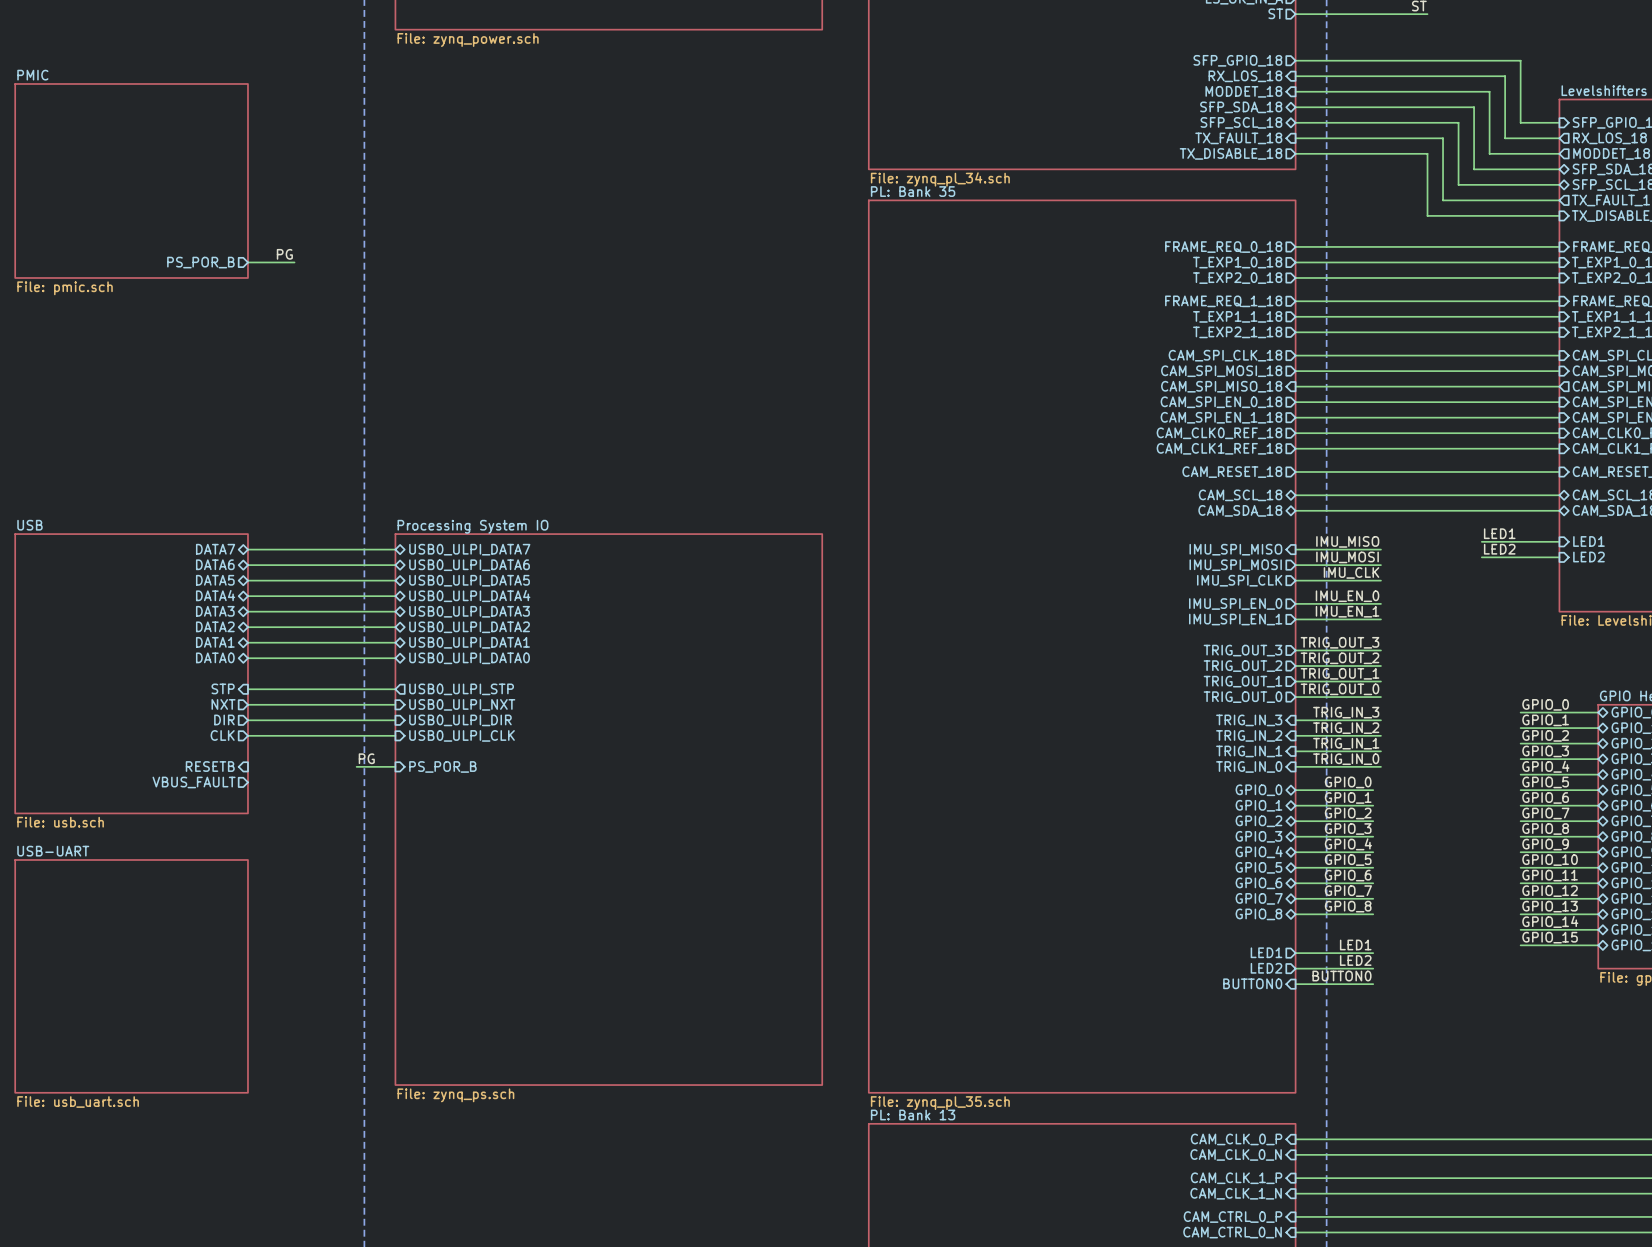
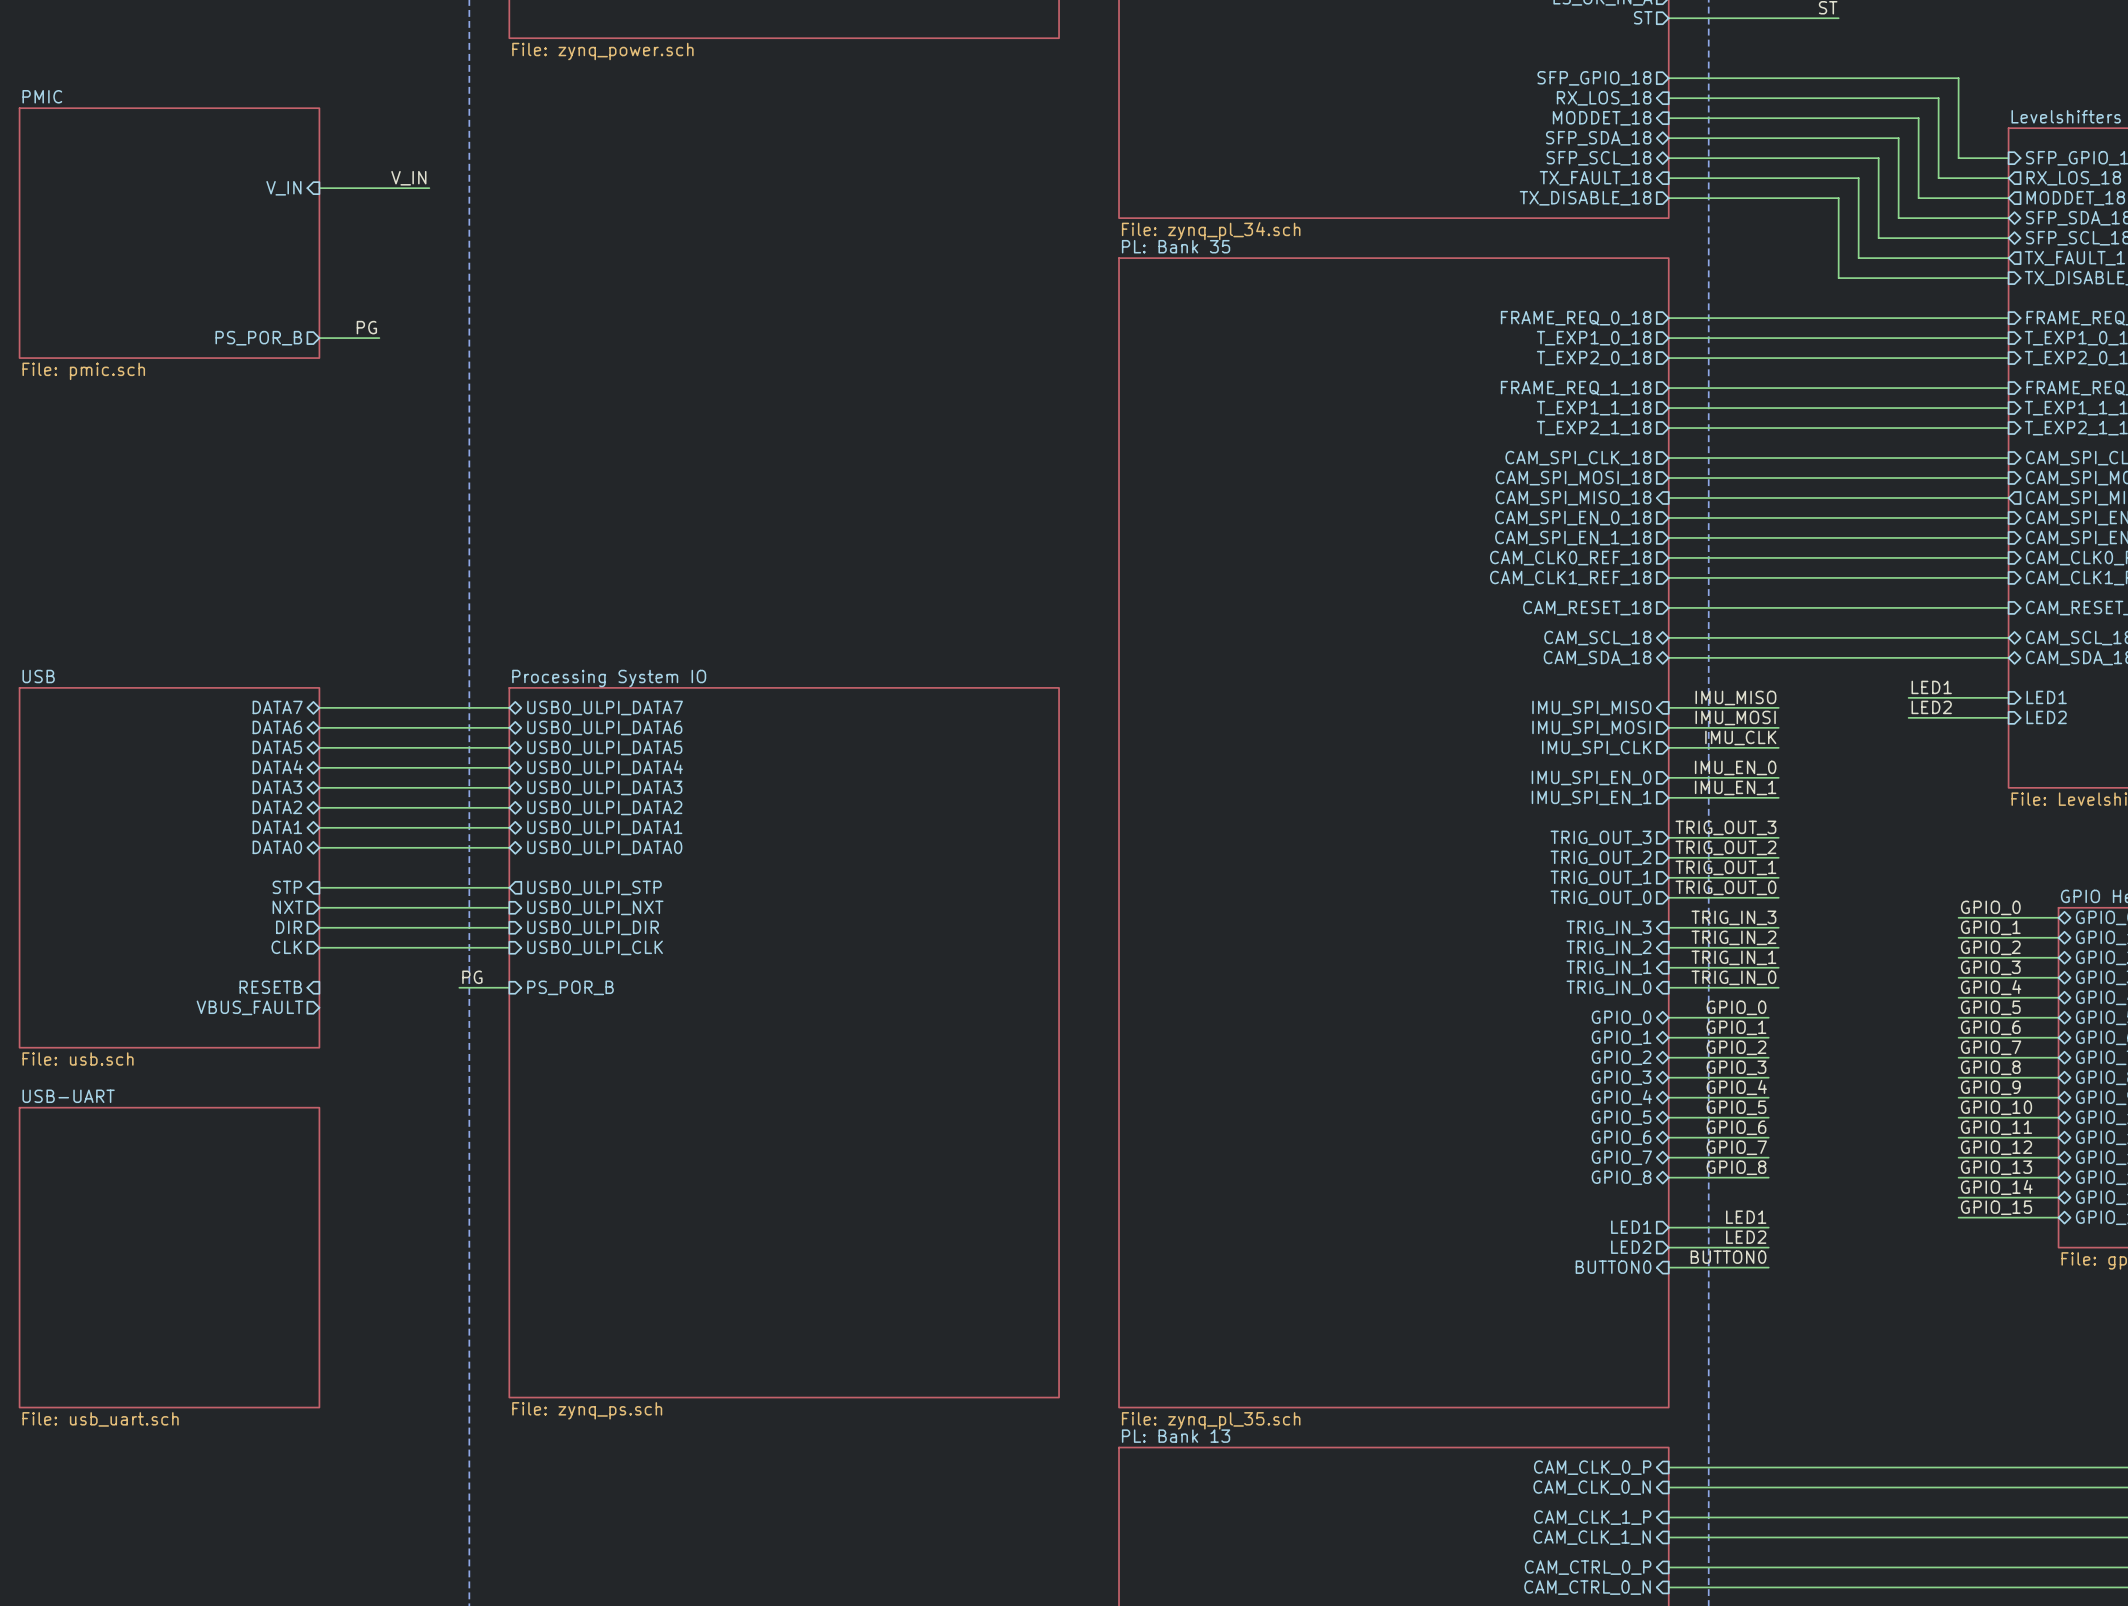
label: none -> V_IN (408, 178)
sheet pin: none -> V_IN (283, 188)
wire: none -> (319, 188) (429, 188)

